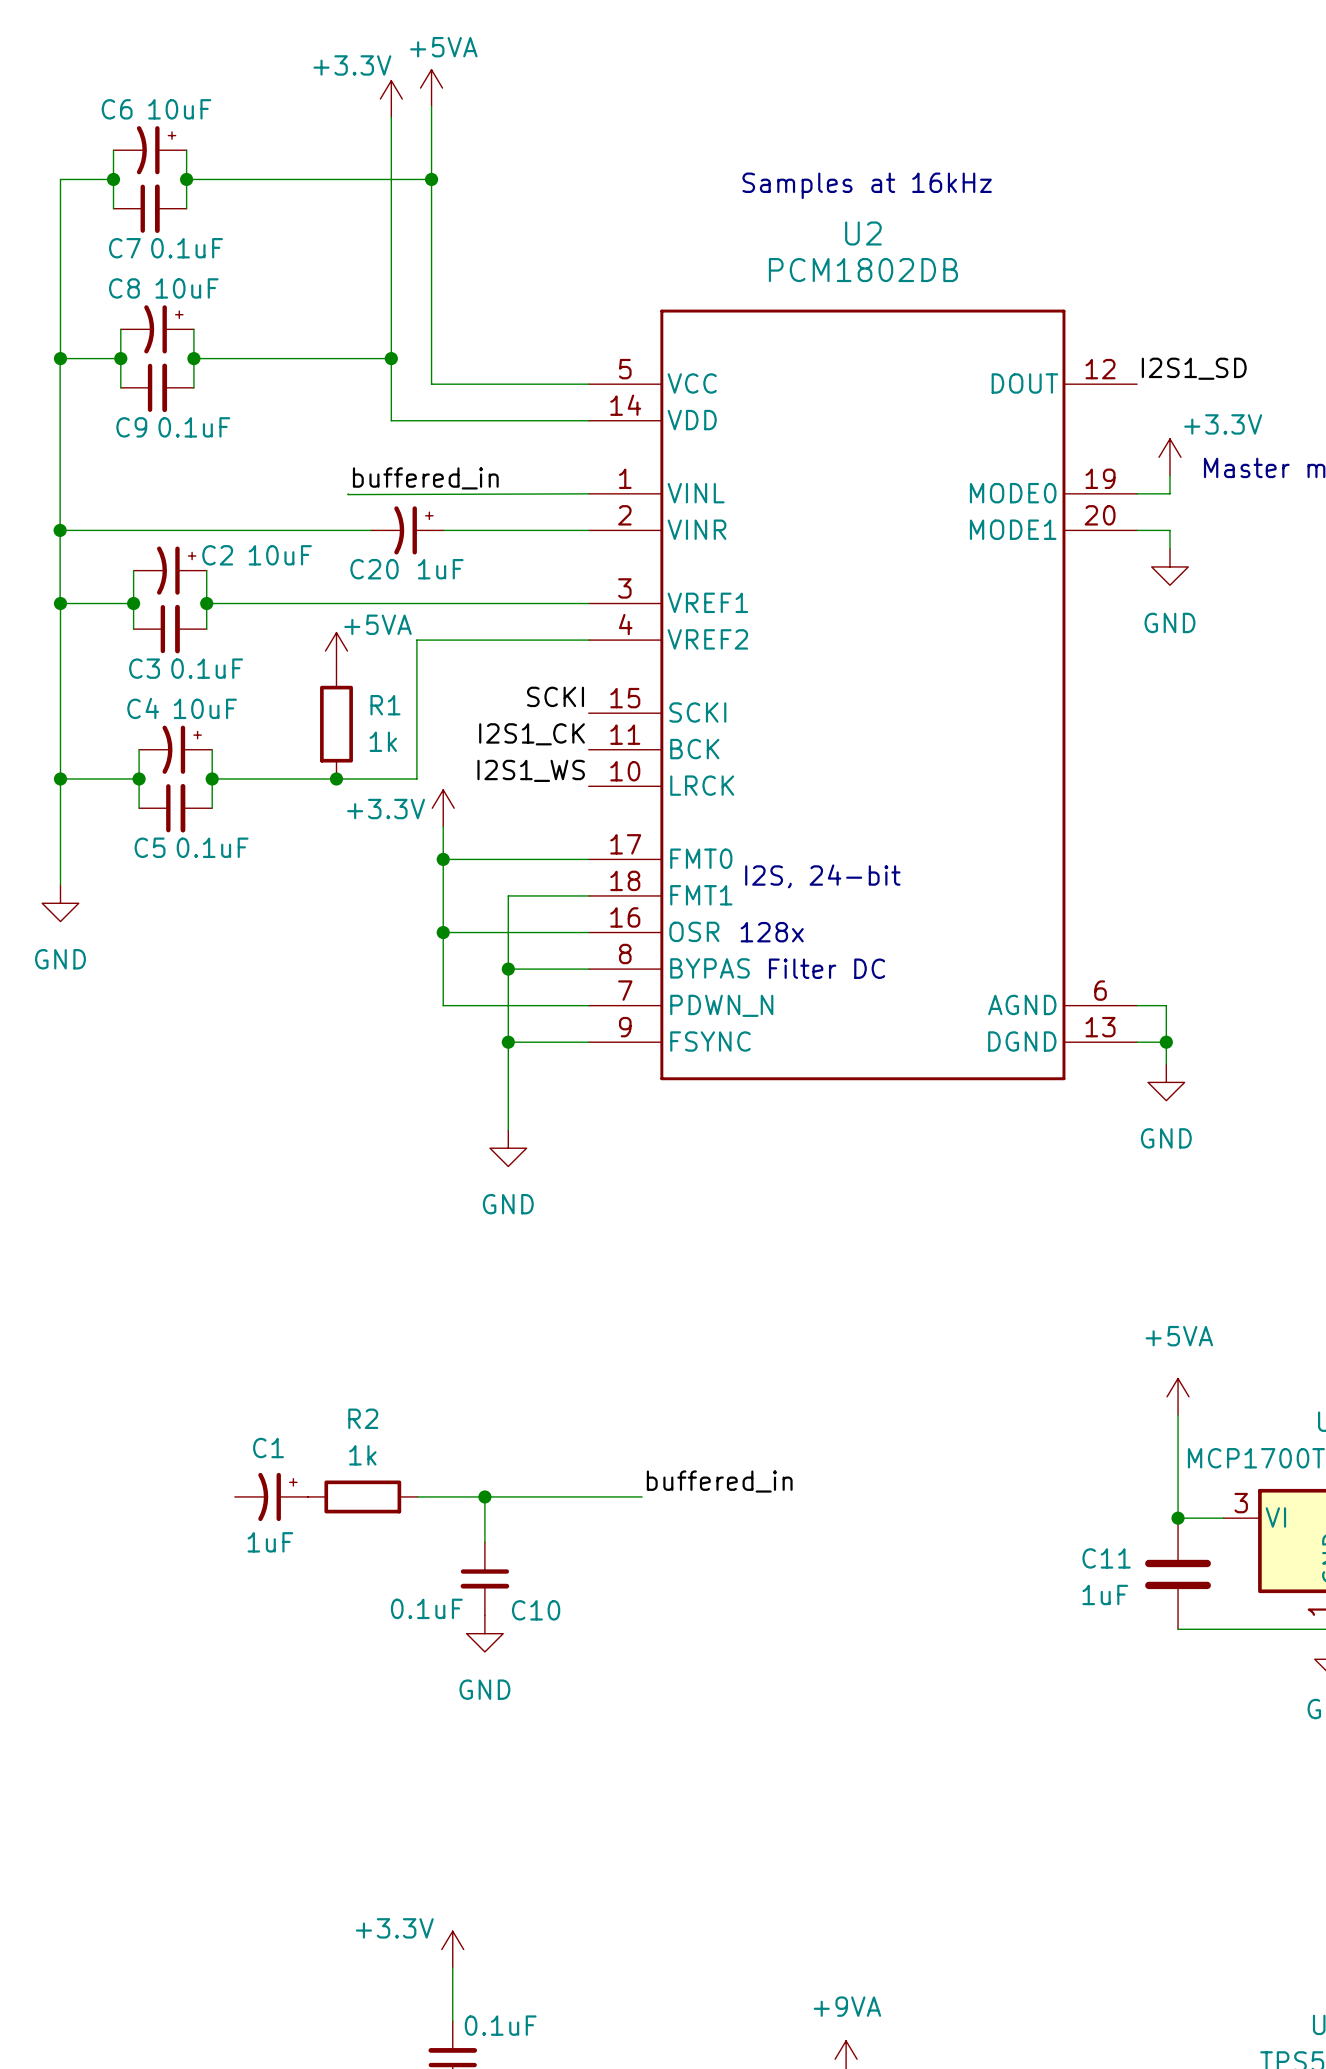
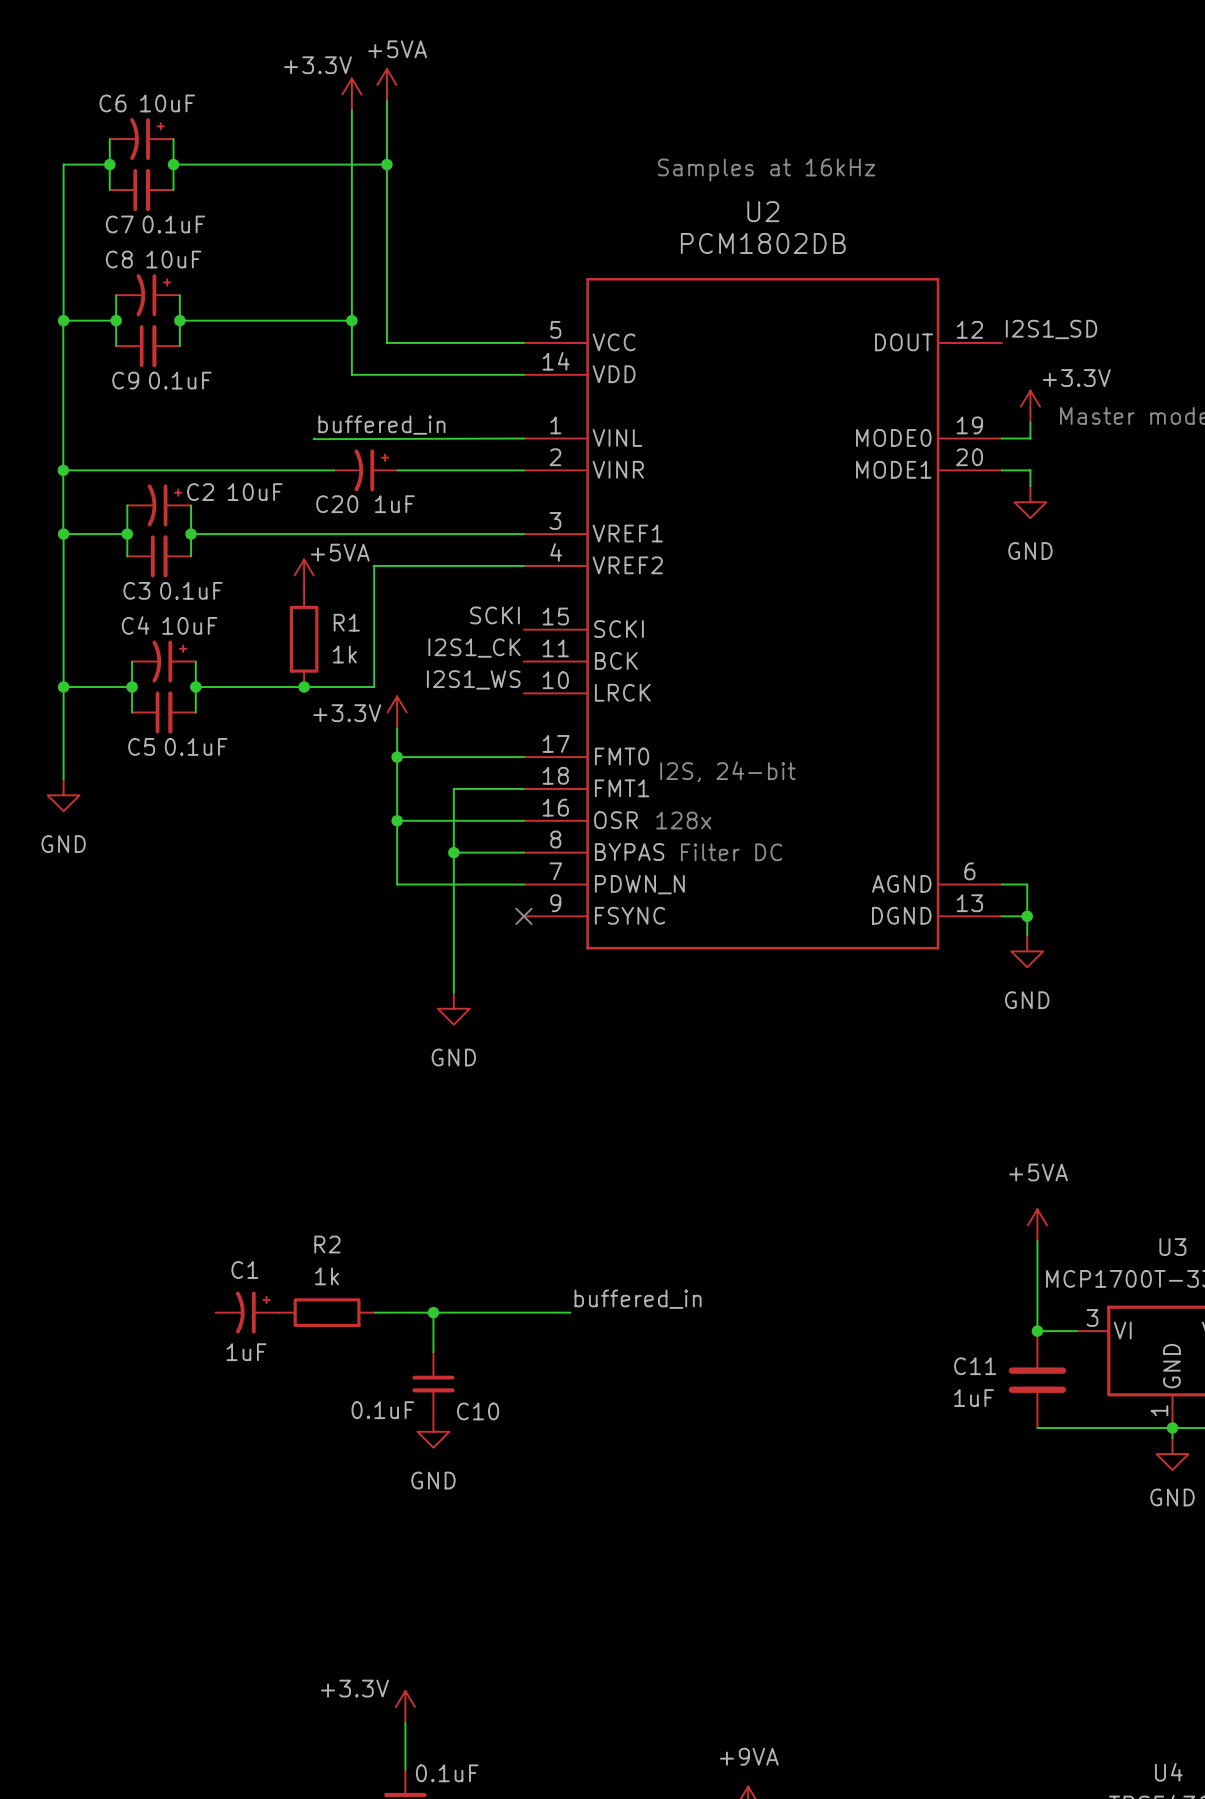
wire: (508, 1042) (588, 1042) -> none
junction: (508, 1042) -> none
no-connect mark: none -> (523, 916)

